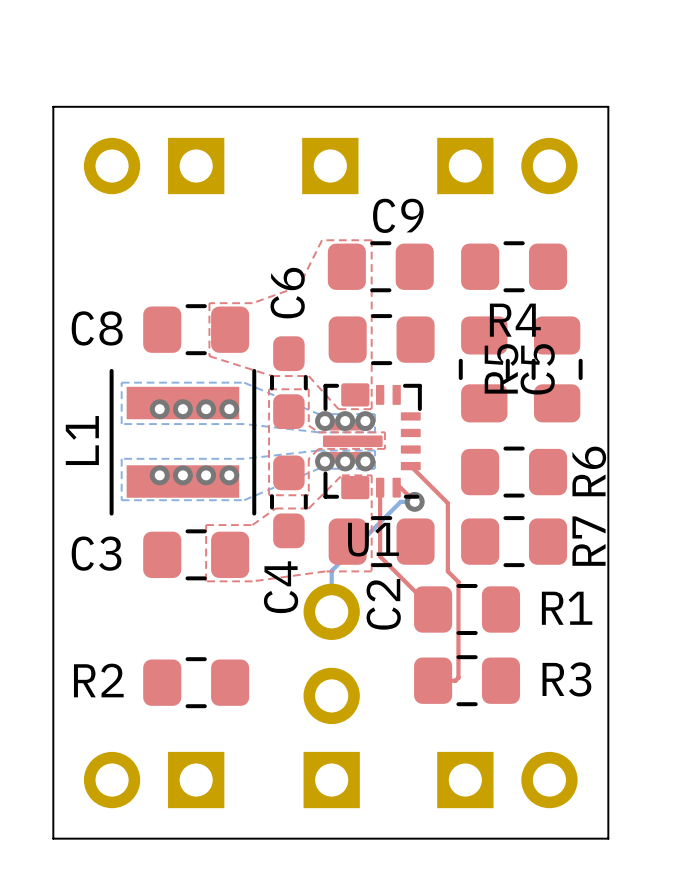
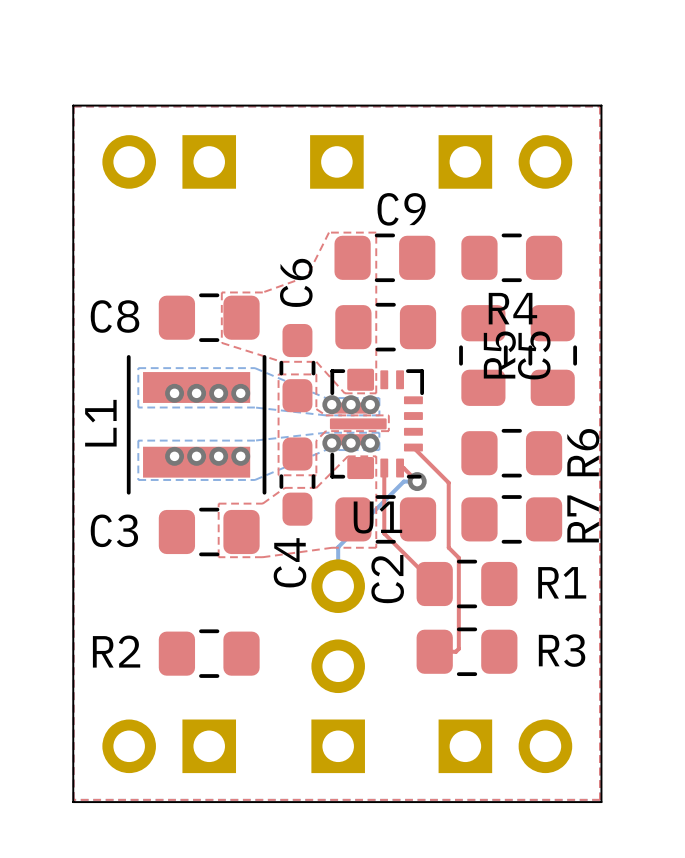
top zone outline: none -> (73, 106) (600, 106) (600, 799) (73, 799) (73, 106)

